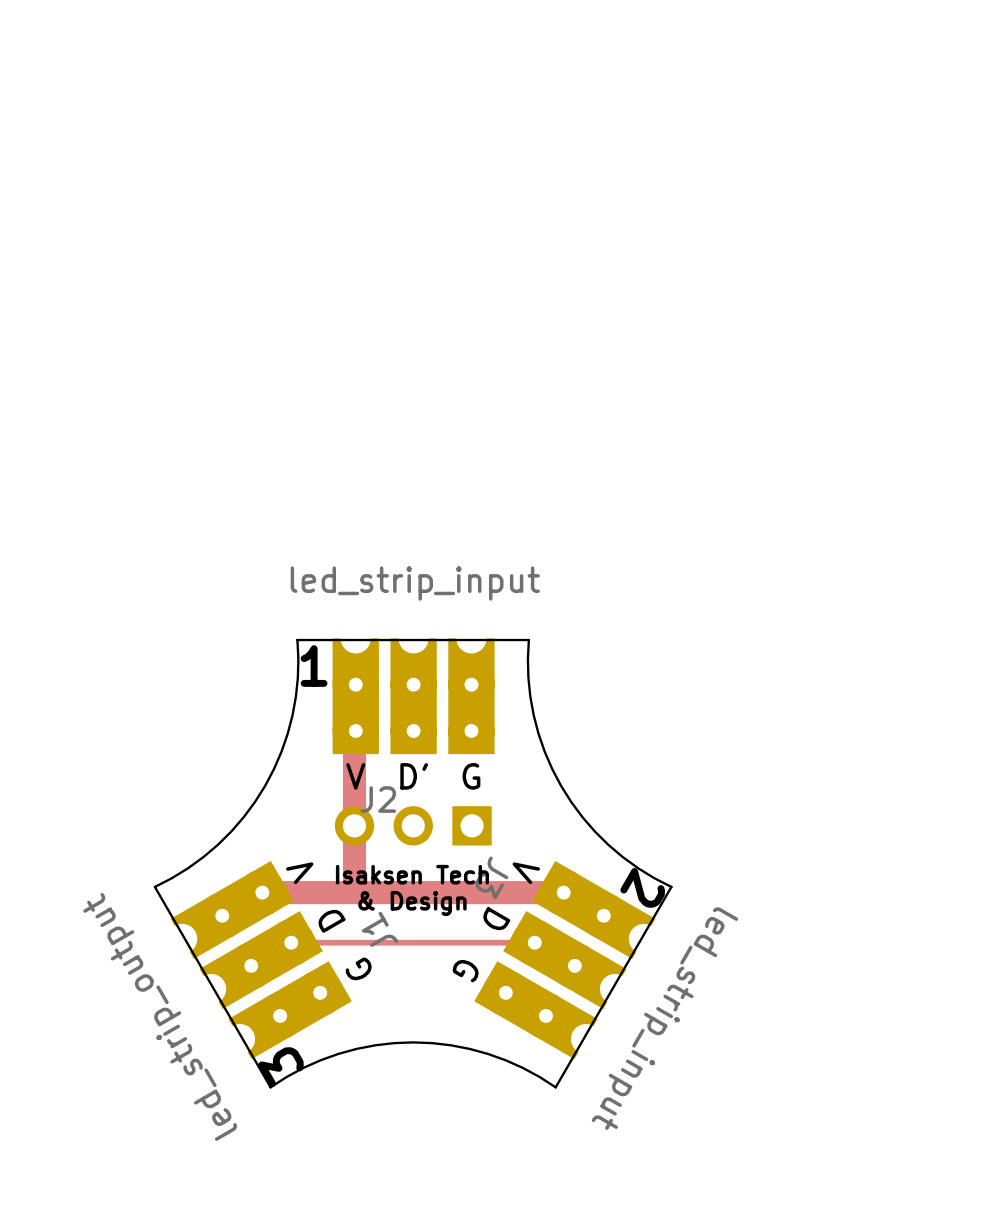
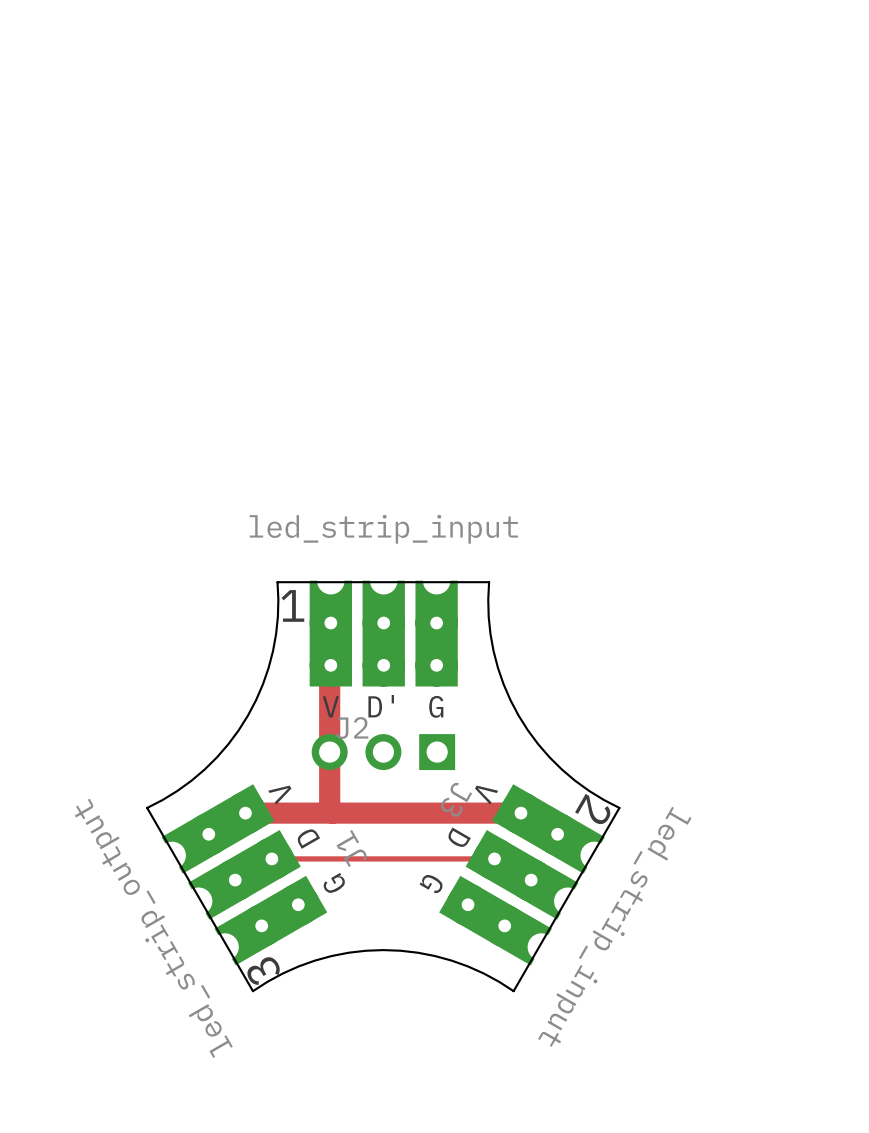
text: Isaksen Tech (412, 874) -> none
text: & Design (412, 903) -> none

